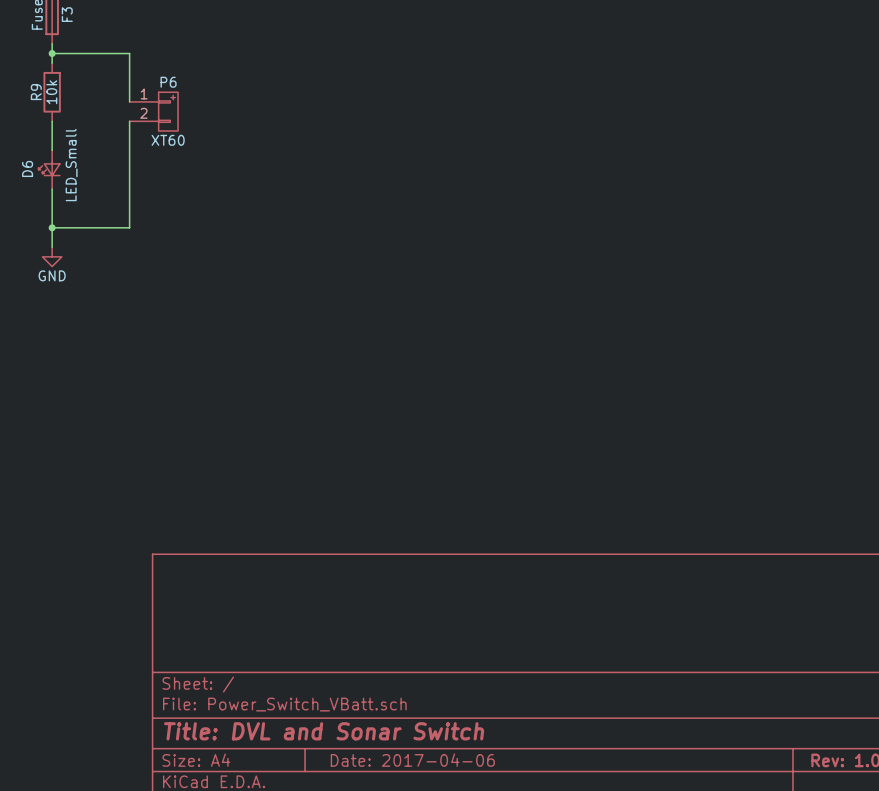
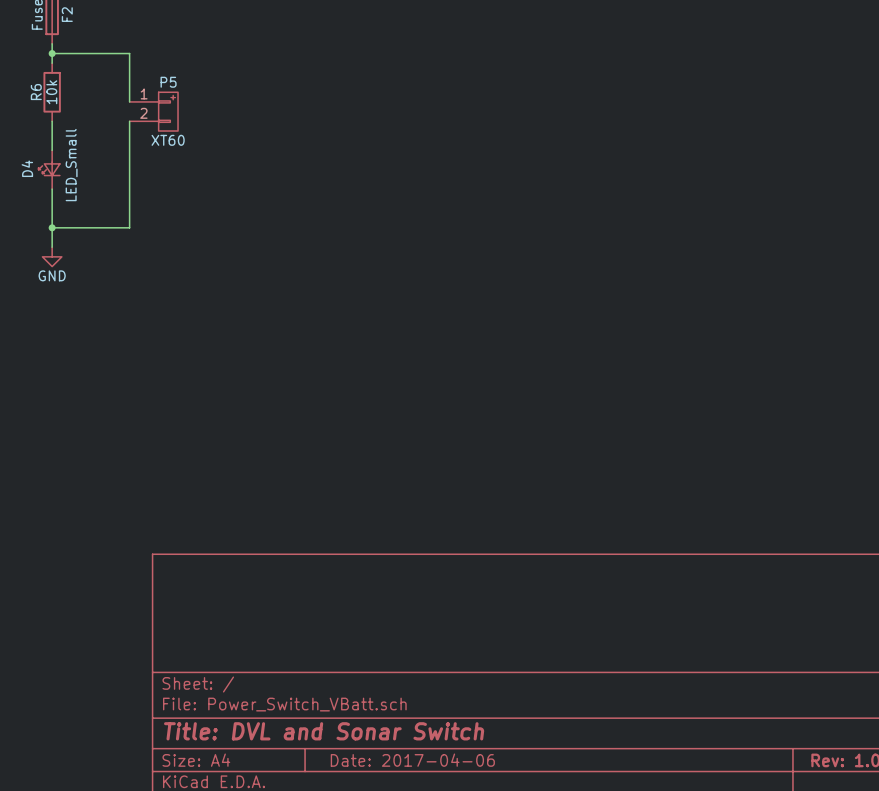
F3 name: F3 (67, 14) -> F2 (67, 14)
P6 name: P6 (168, 82) -> P5 (168, 82)
R9 name: R9 (36, 92) -> R6 (36, 92)
D6 name: D6 (27, 168) -> D4 (27, 168)

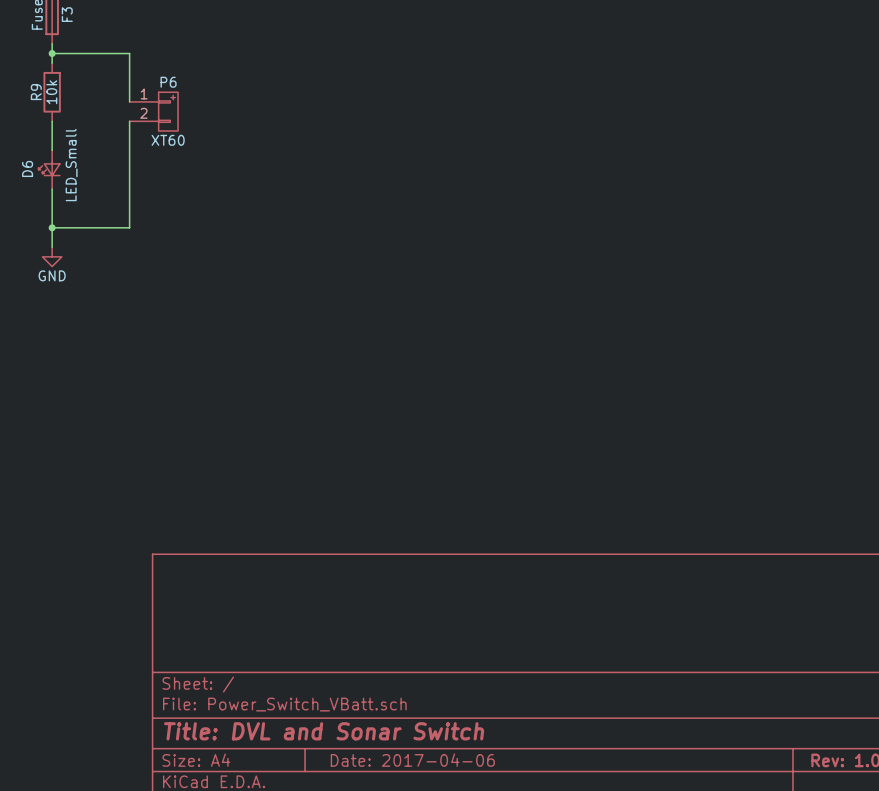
F2 name: F2 (67, 14) -> F3 (67, 14)
P5 name: P5 (168, 82) -> P6 (168, 82)
R6 name: R6 (36, 92) -> R9 (36, 92)
D4 name: D4 (27, 168) -> D6 (27, 168)

